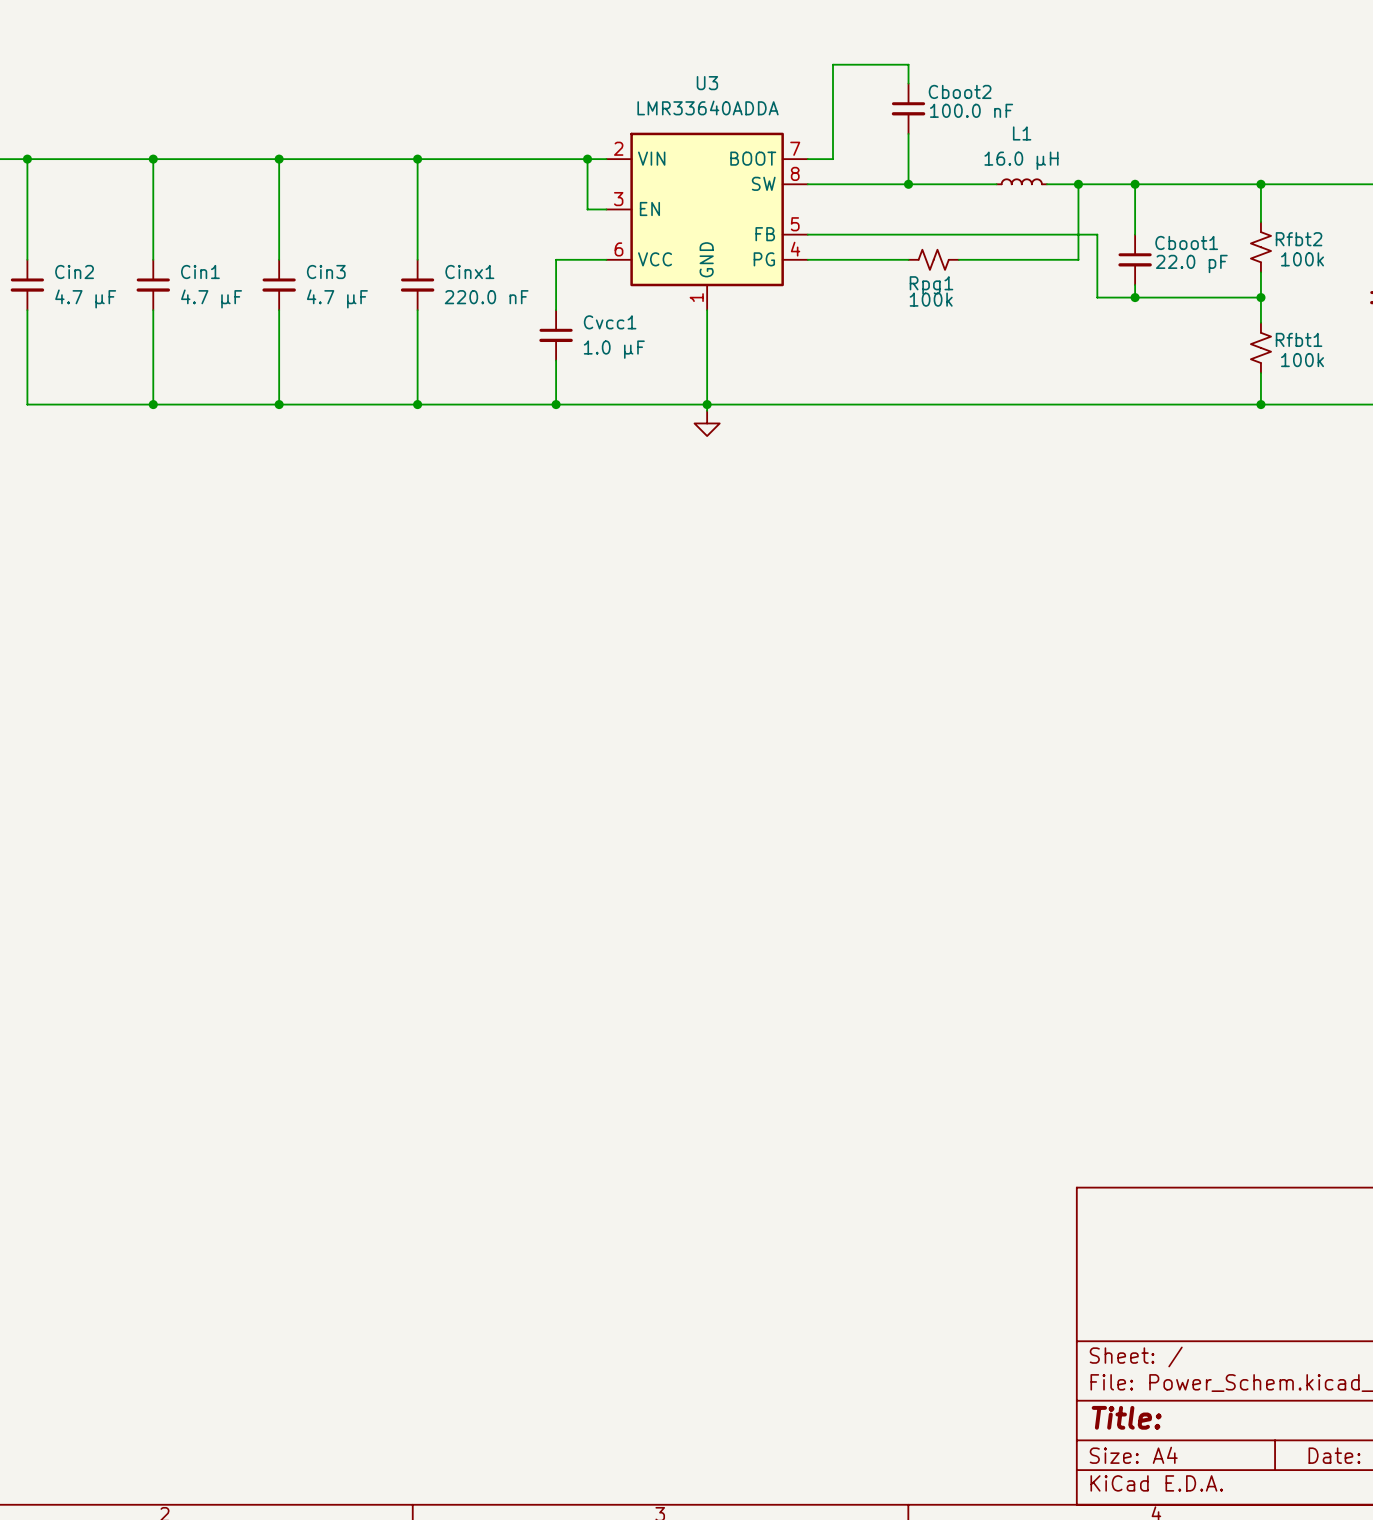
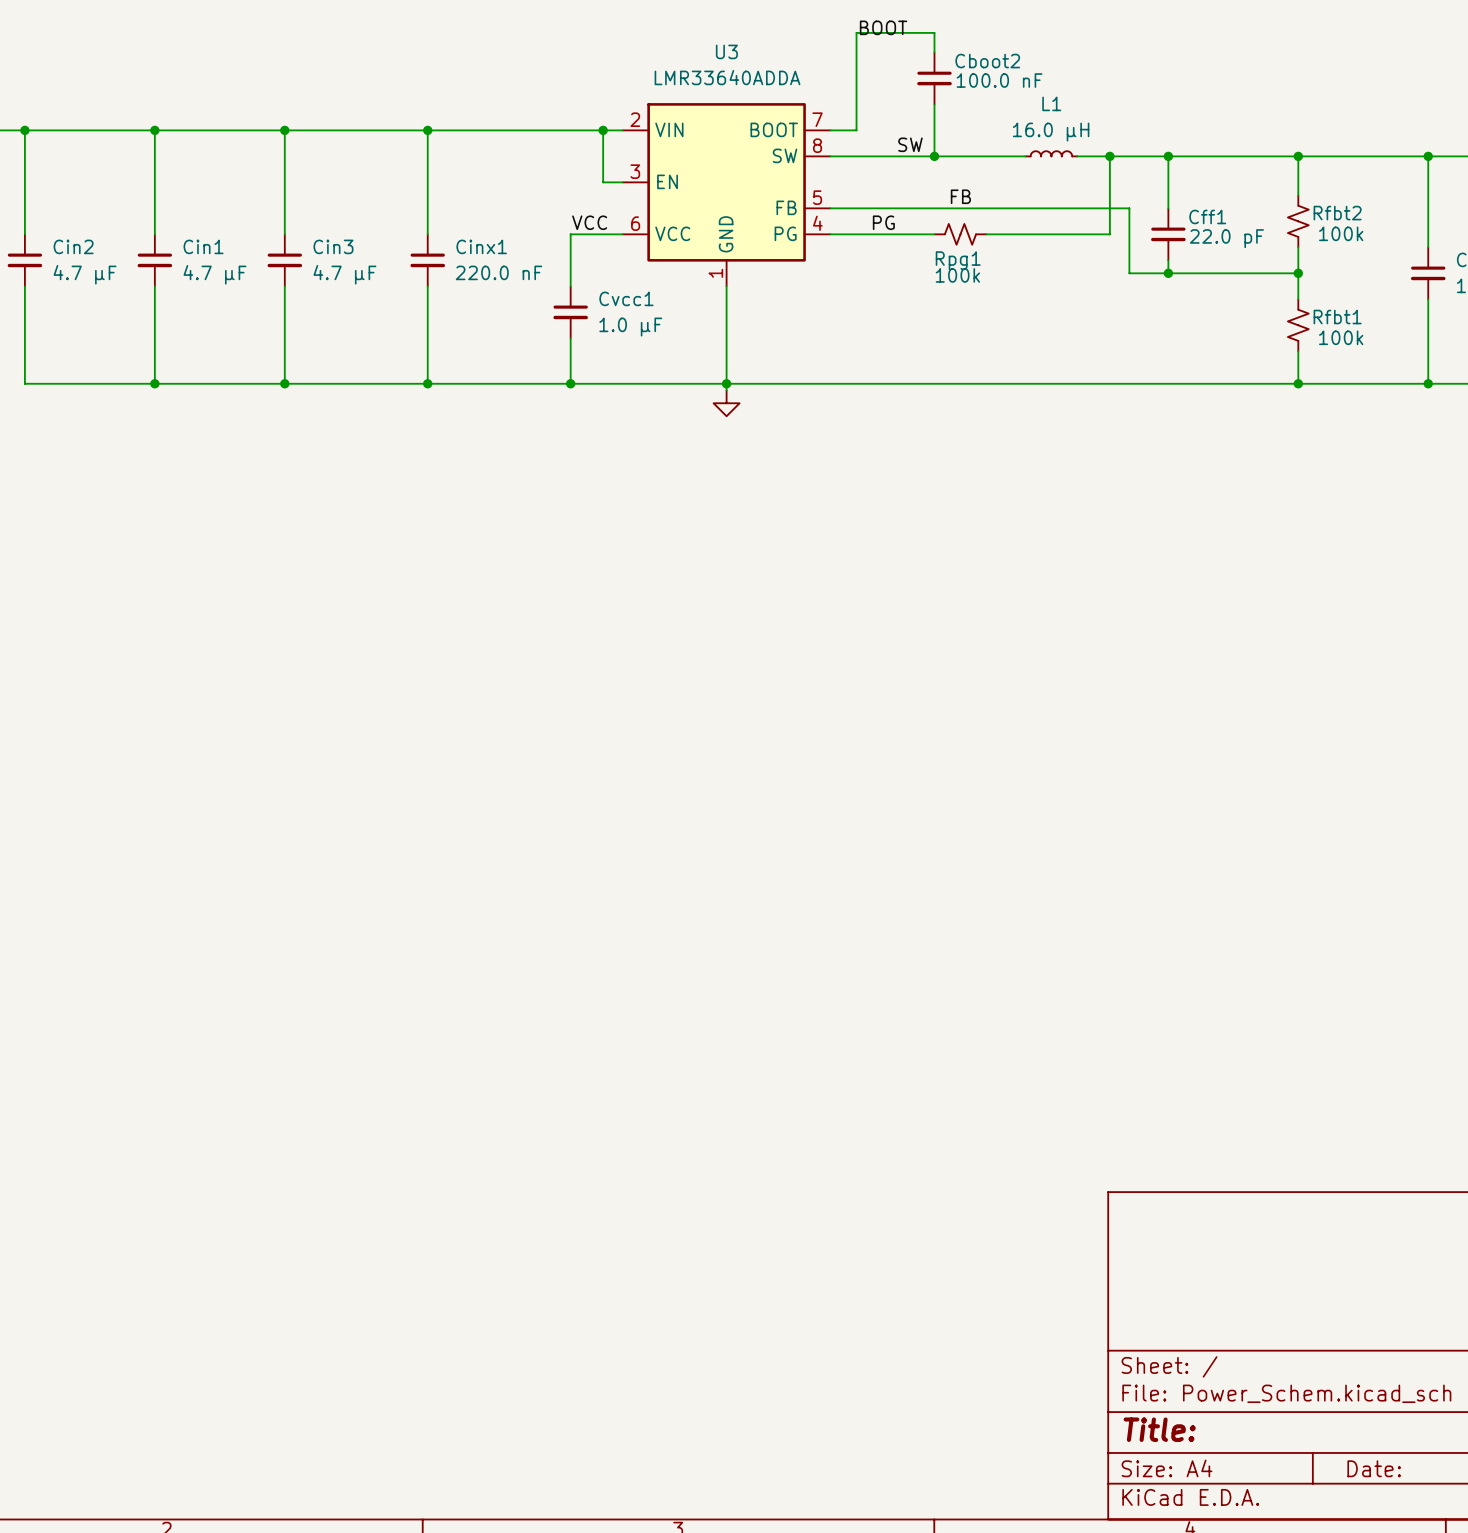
label: none -> BOOT (883, 27)
label: none -> SW (910, 144)
label: none -> FB (960, 196)
Cboot1 name: Cboot1 (1186, 242) -> Cff1 (1207, 216)
label: none -> VCC (589, 222)
label: none -> PG (883, 222)

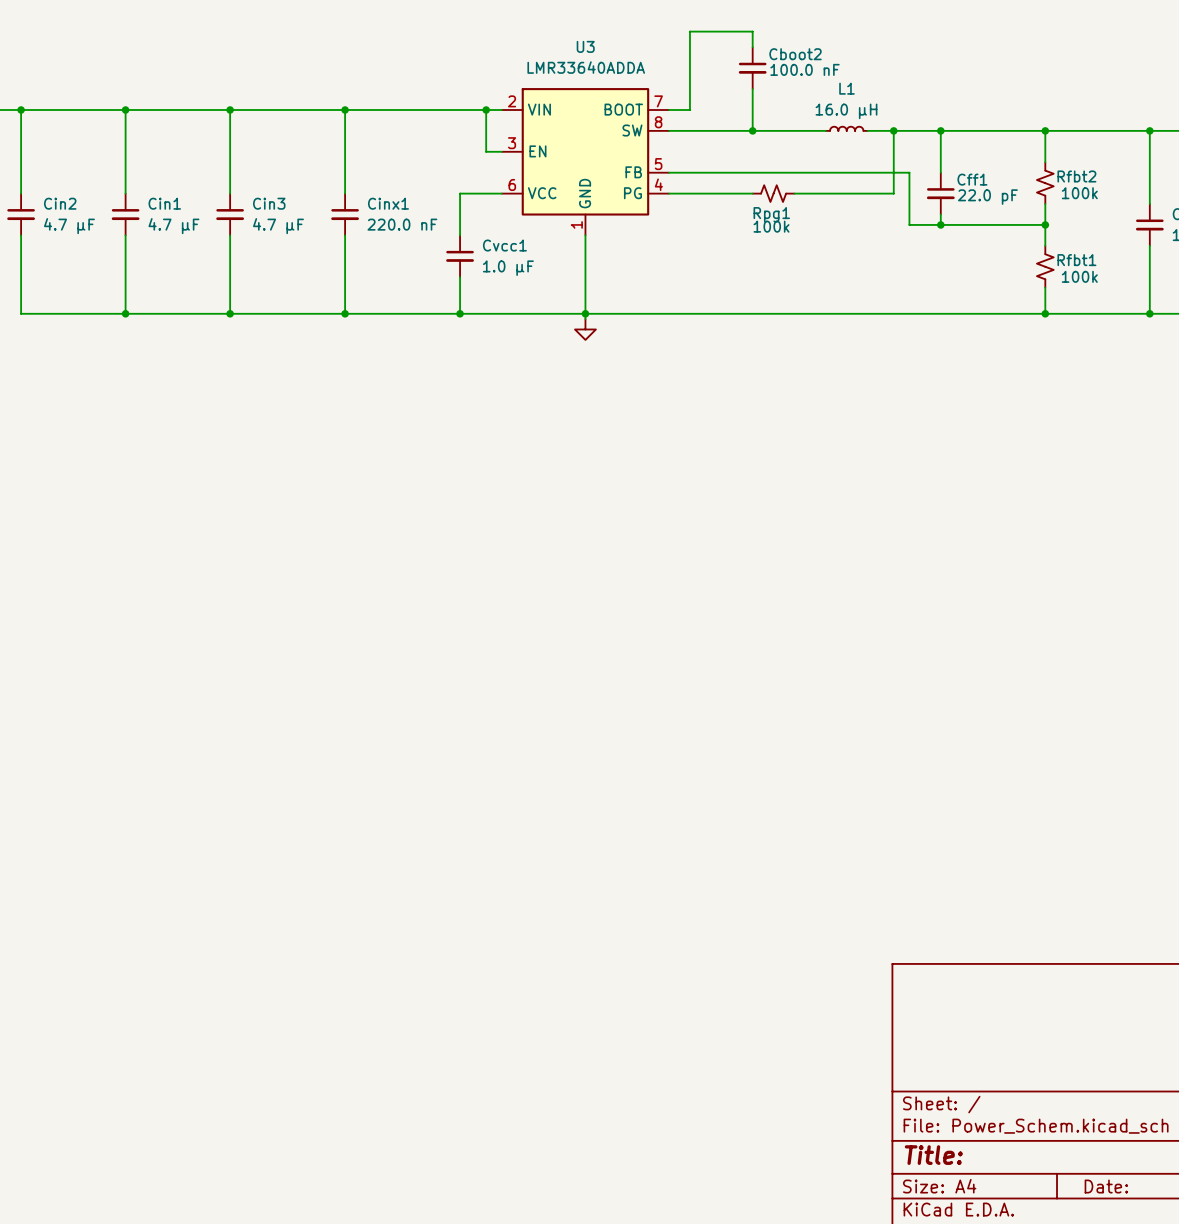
label: BOOT (883, 27) -> none
label: SW (910, 144) -> none
label: FB (960, 196) -> none
label: VCC (589, 222) -> none
label: PG (883, 222) -> none

